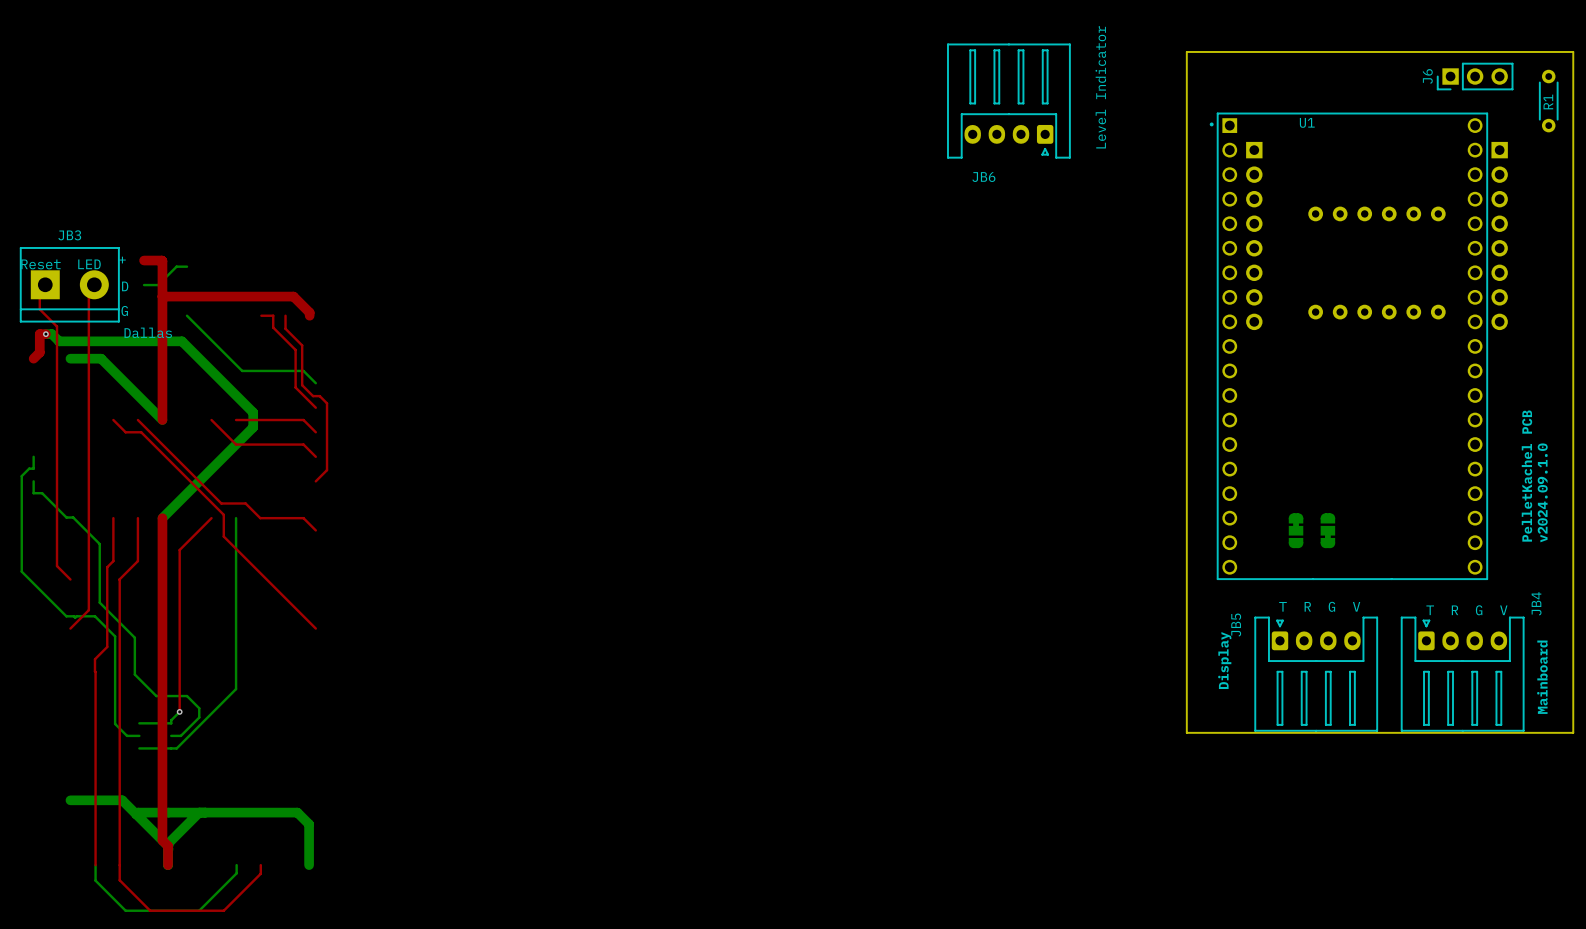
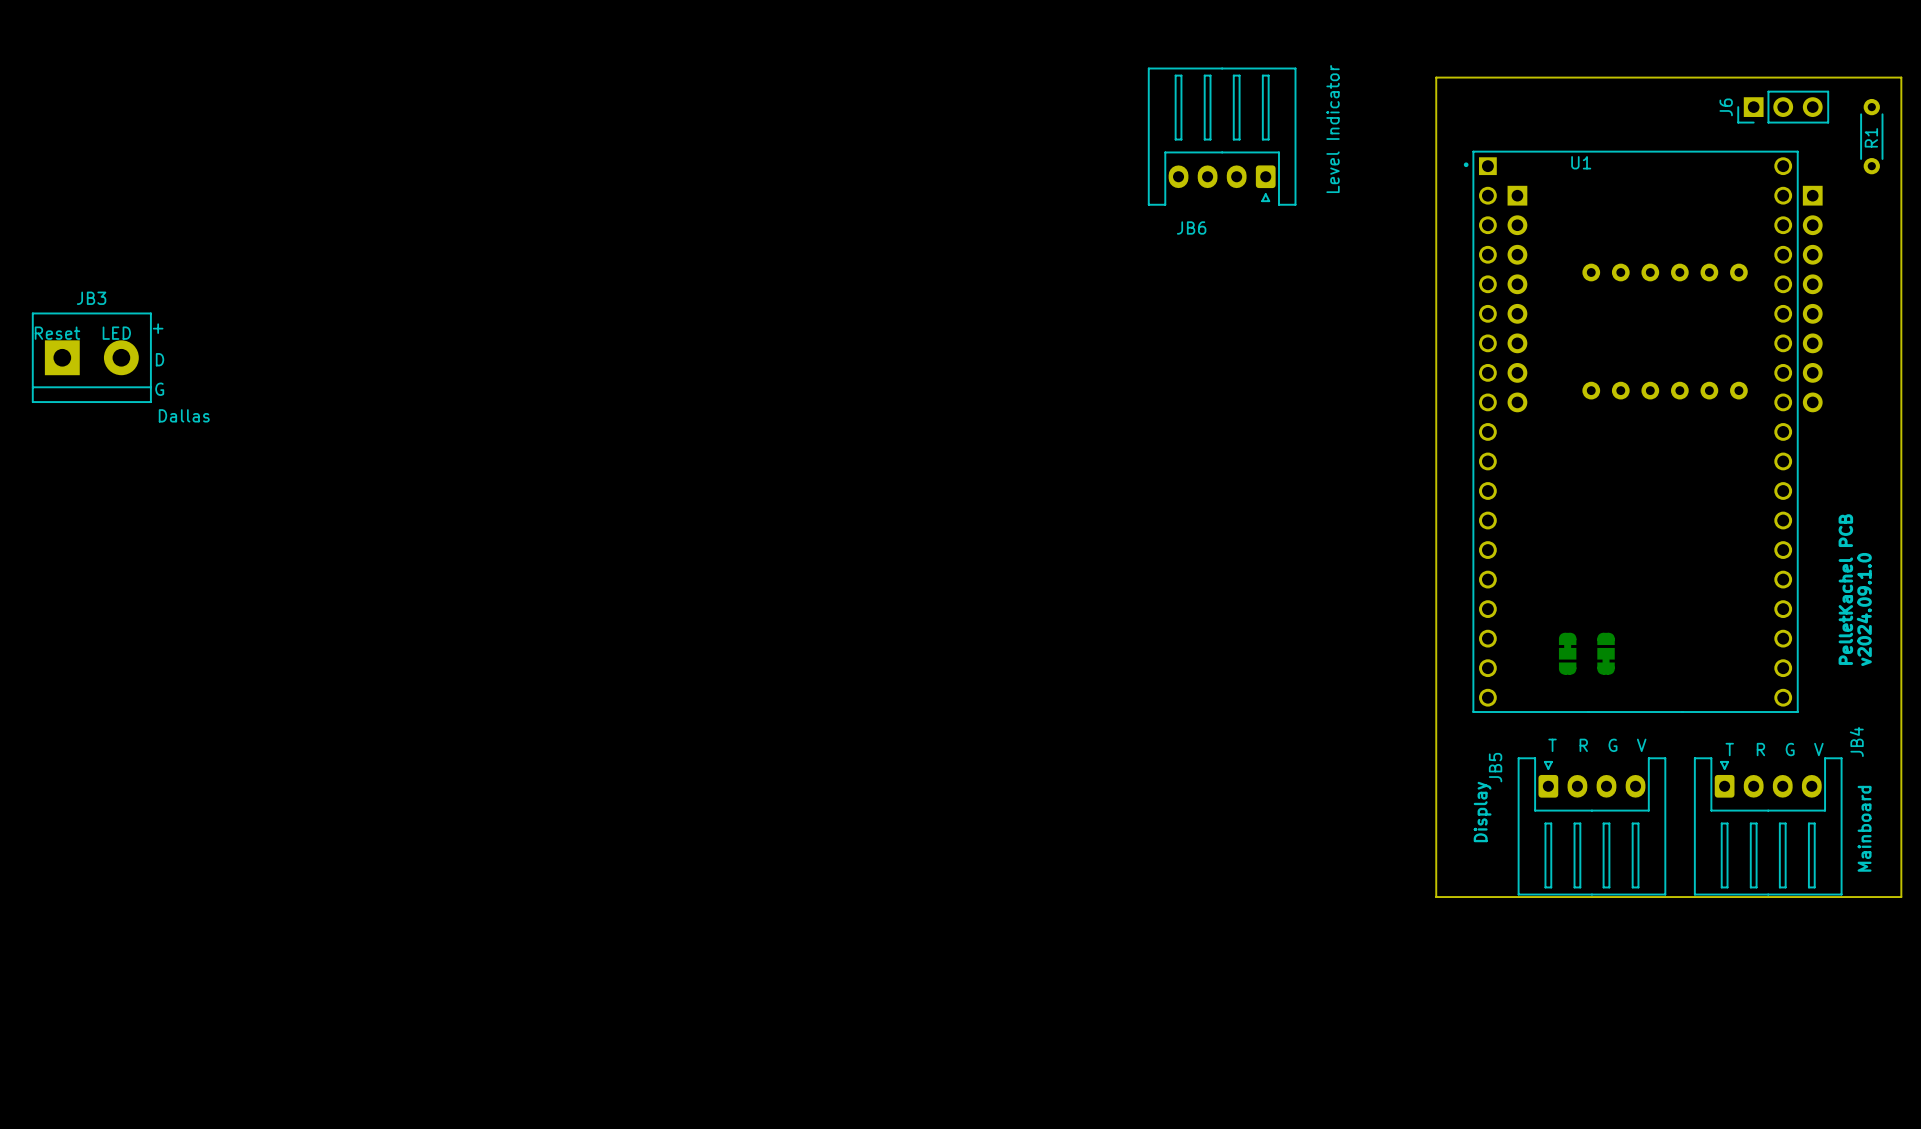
top track: (144, 260) (162, 261) (162, 420) -> none
bottom track: (186, 266) (176, 266) (158, 285) (144, 285) -> none
top track: (39, 291) (39, 309) (57, 326) (57, 566) (70, 579) -> none
top track: (88, 291) (88, 610) (70, 628) -> none
top track: (162, 296) (293, 296) (309, 312) (309, 315) -> none
bottom track: (186, 315) (242, 370) (303, 370) (315, 383) -> none
top track: (261, 315) (273, 315) (273, 327) (295, 349) (295, 387) (315, 407) -> none
top track: (285, 315) (285, 328) (302, 345) (302, 385) (313, 396) (319, 396) (327, 403) (327, 470) (315, 481) -> none
bottom track: (45, 334) (51, 334) (59, 341) (181, 341) (253, 412) (253, 427) (162, 518) -> none
top track: (45, 334) (39, 334) (39, 352) (33, 358) -> none
via: (45, 334) -> none
bottom track: (70, 358) (101, 358) (162, 420) -> none
top track: (113, 420) (125, 432) (141, 432) (223, 514) (223, 536) (315, 628) -> none
top track: (137, 420) (221, 503) (245, 503) (260, 518) (303, 518) (315, 530) -> none
top track: (211, 420) (236, 444) (303, 444) (315, 456) -> none
top track: (236, 420) (303, 420) (315, 432) -> none
bottom track: (33, 456) (33, 468) (29, 468) (21, 476) (21, 571) (66, 616) (94, 616) (115, 636) (115, 723) (127, 735) (139, 735) -> none
bottom track: (33, 481) (33, 493) (42, 493) (66, 517) (73, 517) (99, 544) (99, 602) (134, 637) (134, 674) (156, 696) (186, 696) (199, 708) (199, 717) (180, 735) (171, 735) -> none
top track: (113, 518) (113, 561) (107, 567) (107, 646) (94, 659) (95, 865) -> none
top track: (137, 518) (137, 561) (119, 579) (119, 880) (150, 910) (223, 910) (260, 873) (260, 865) -> none
top track: (162, 518) (162, 840) (168, 846) (168, 865) -> none
top track: (211, 518) (179, 550) (179, 711) -> none
bottom track: (236, 518) (236, 689) (176, 748) (139, 748) -> none
bottom track: (179, 711) (171, 720) (171, 723) (139, 723) -> none
via: (179, 711) -> none
bottom track: (70, 800) (122, 800) (168, 845) -> none
bottom track: (199, 812) (168, 843) (168, 865) -> none
bottom track: (136, 814) (137, 812) (297, 812) (309, 824) (309, 865) -> none
bottom track: (95, 865) (95, 880) (125, 910) (199, 910) (236, 873) (236, 865) -> none

